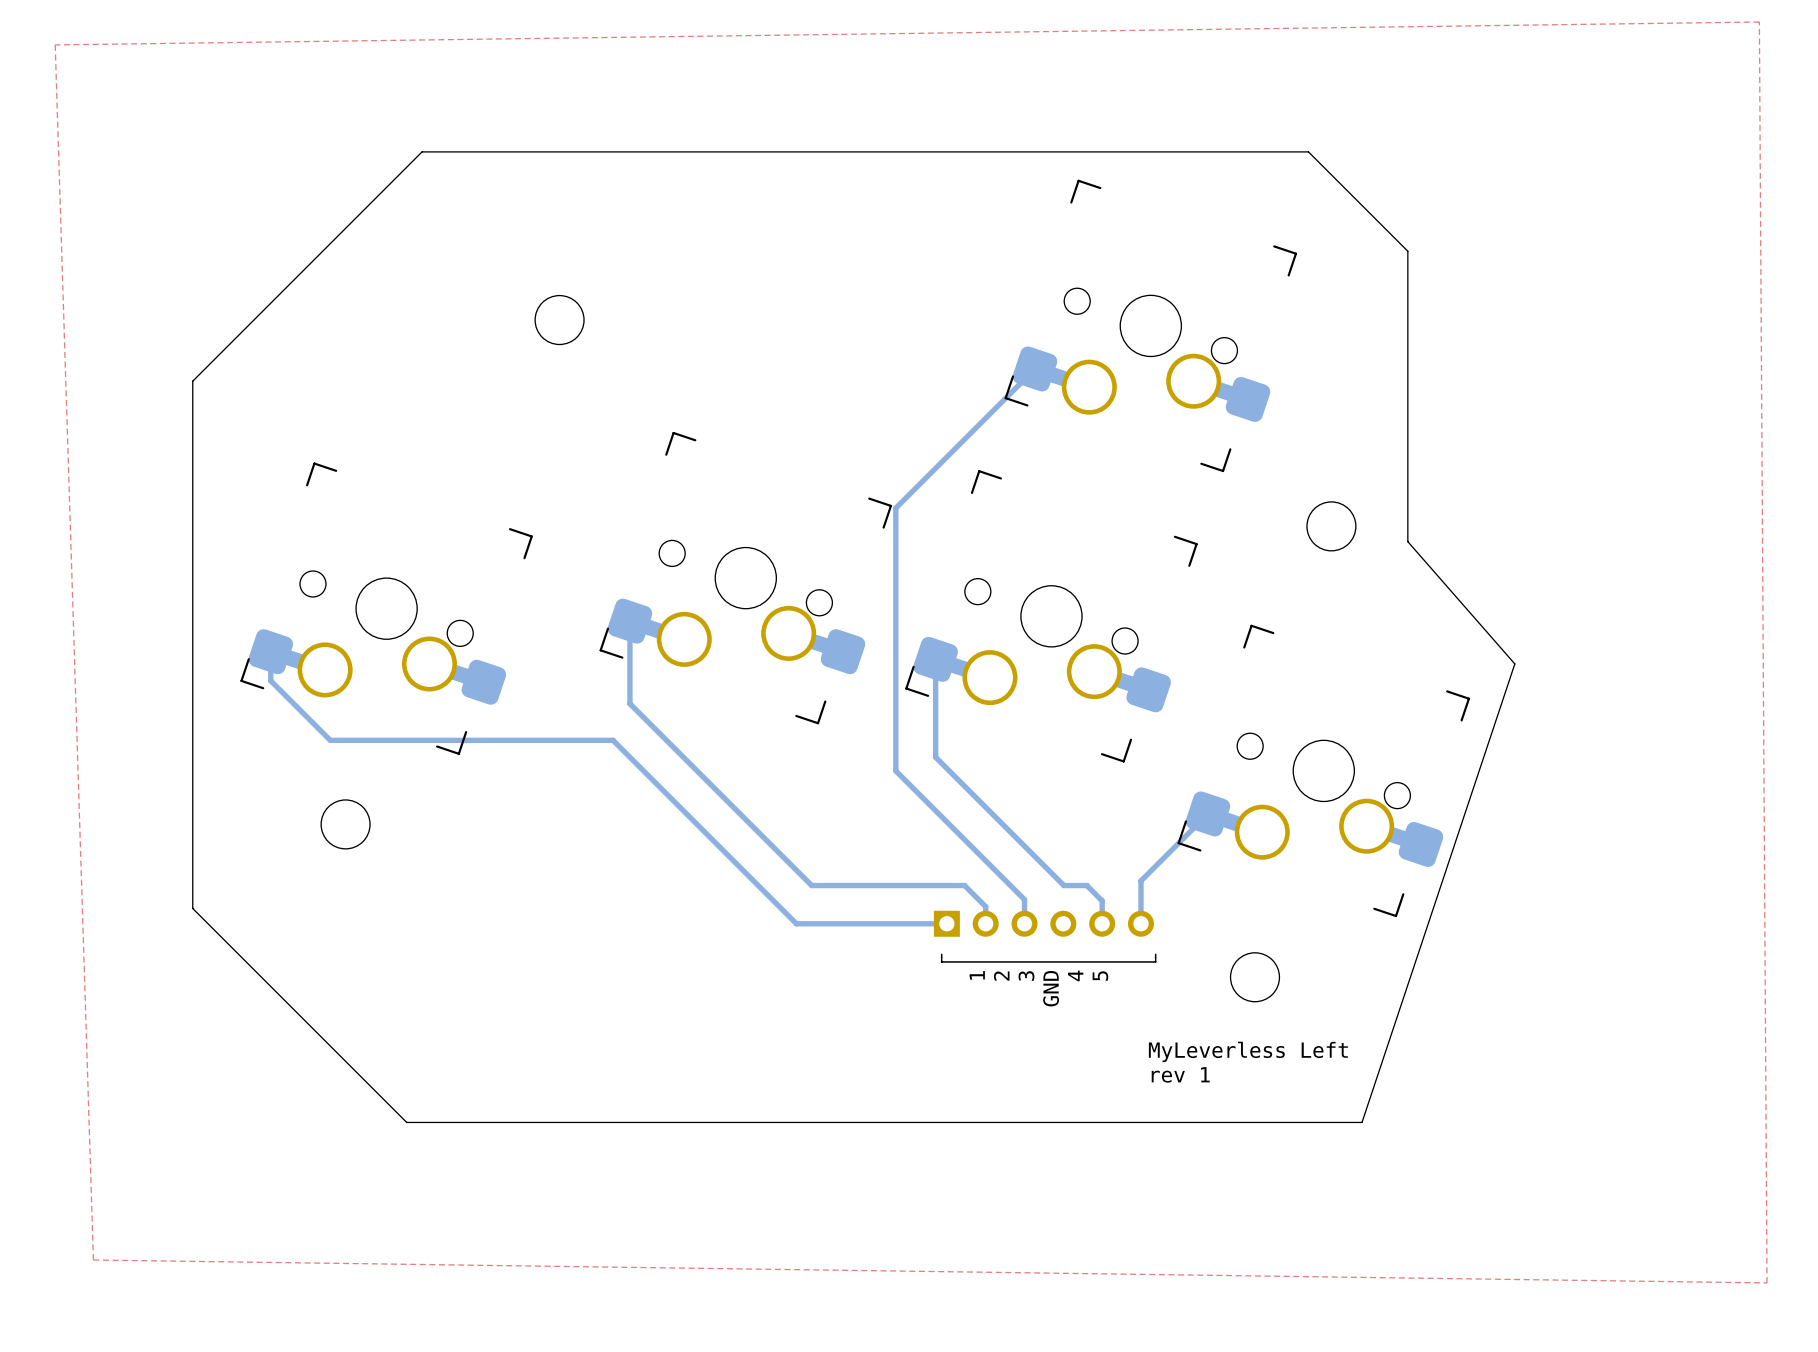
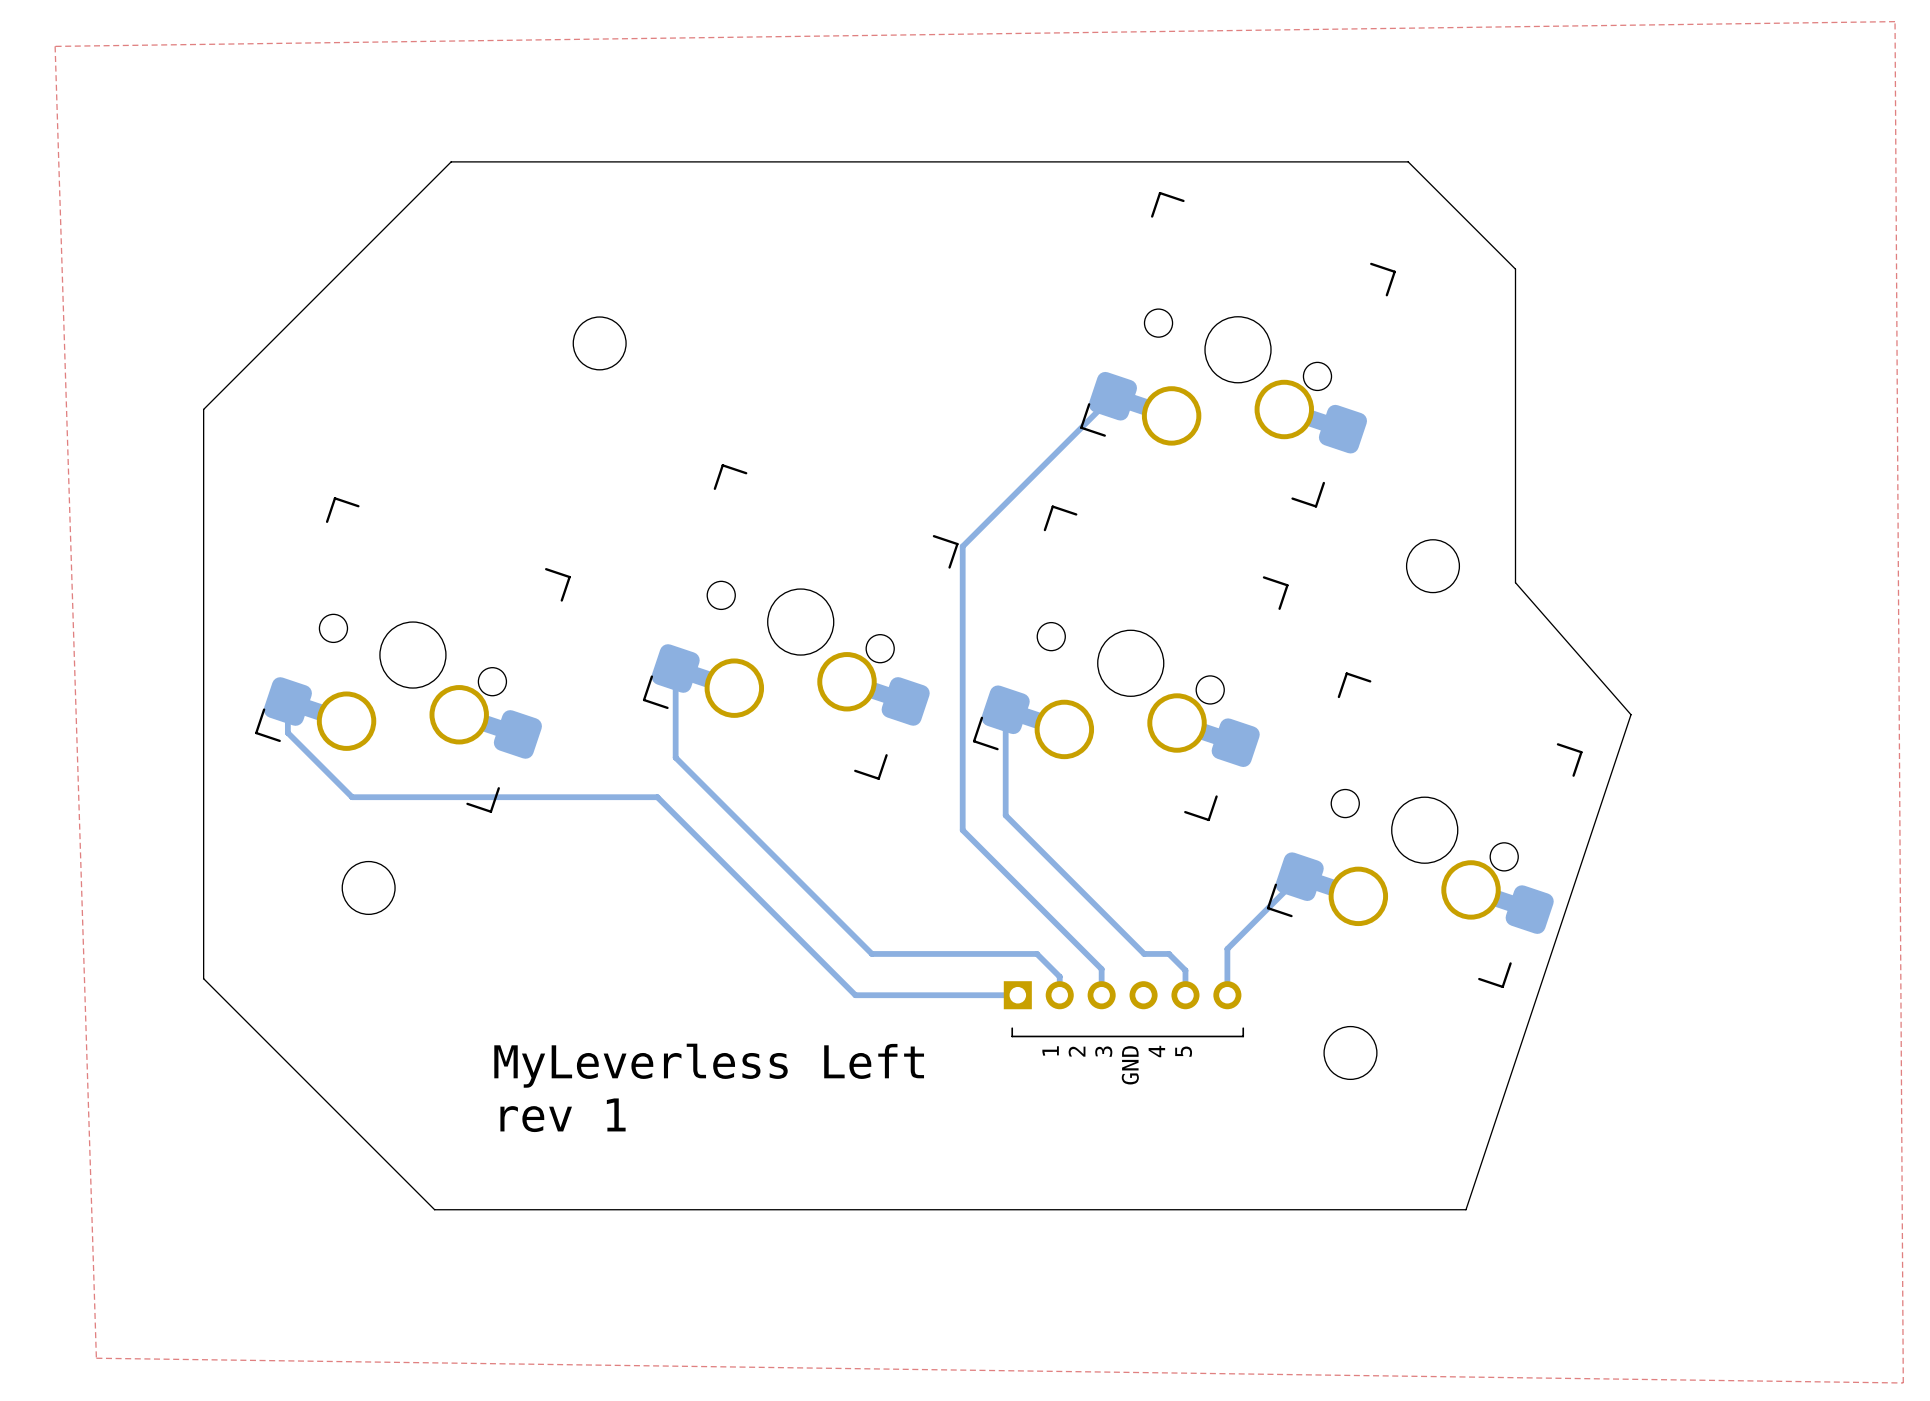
text: none -> MyLeverless Left (709, 1065)
text: none -> rev 1 (563, 1115)
text: MyLeverless Left (1248, 1051) -> none
text: rev 1 (1180, 1074) -> none

